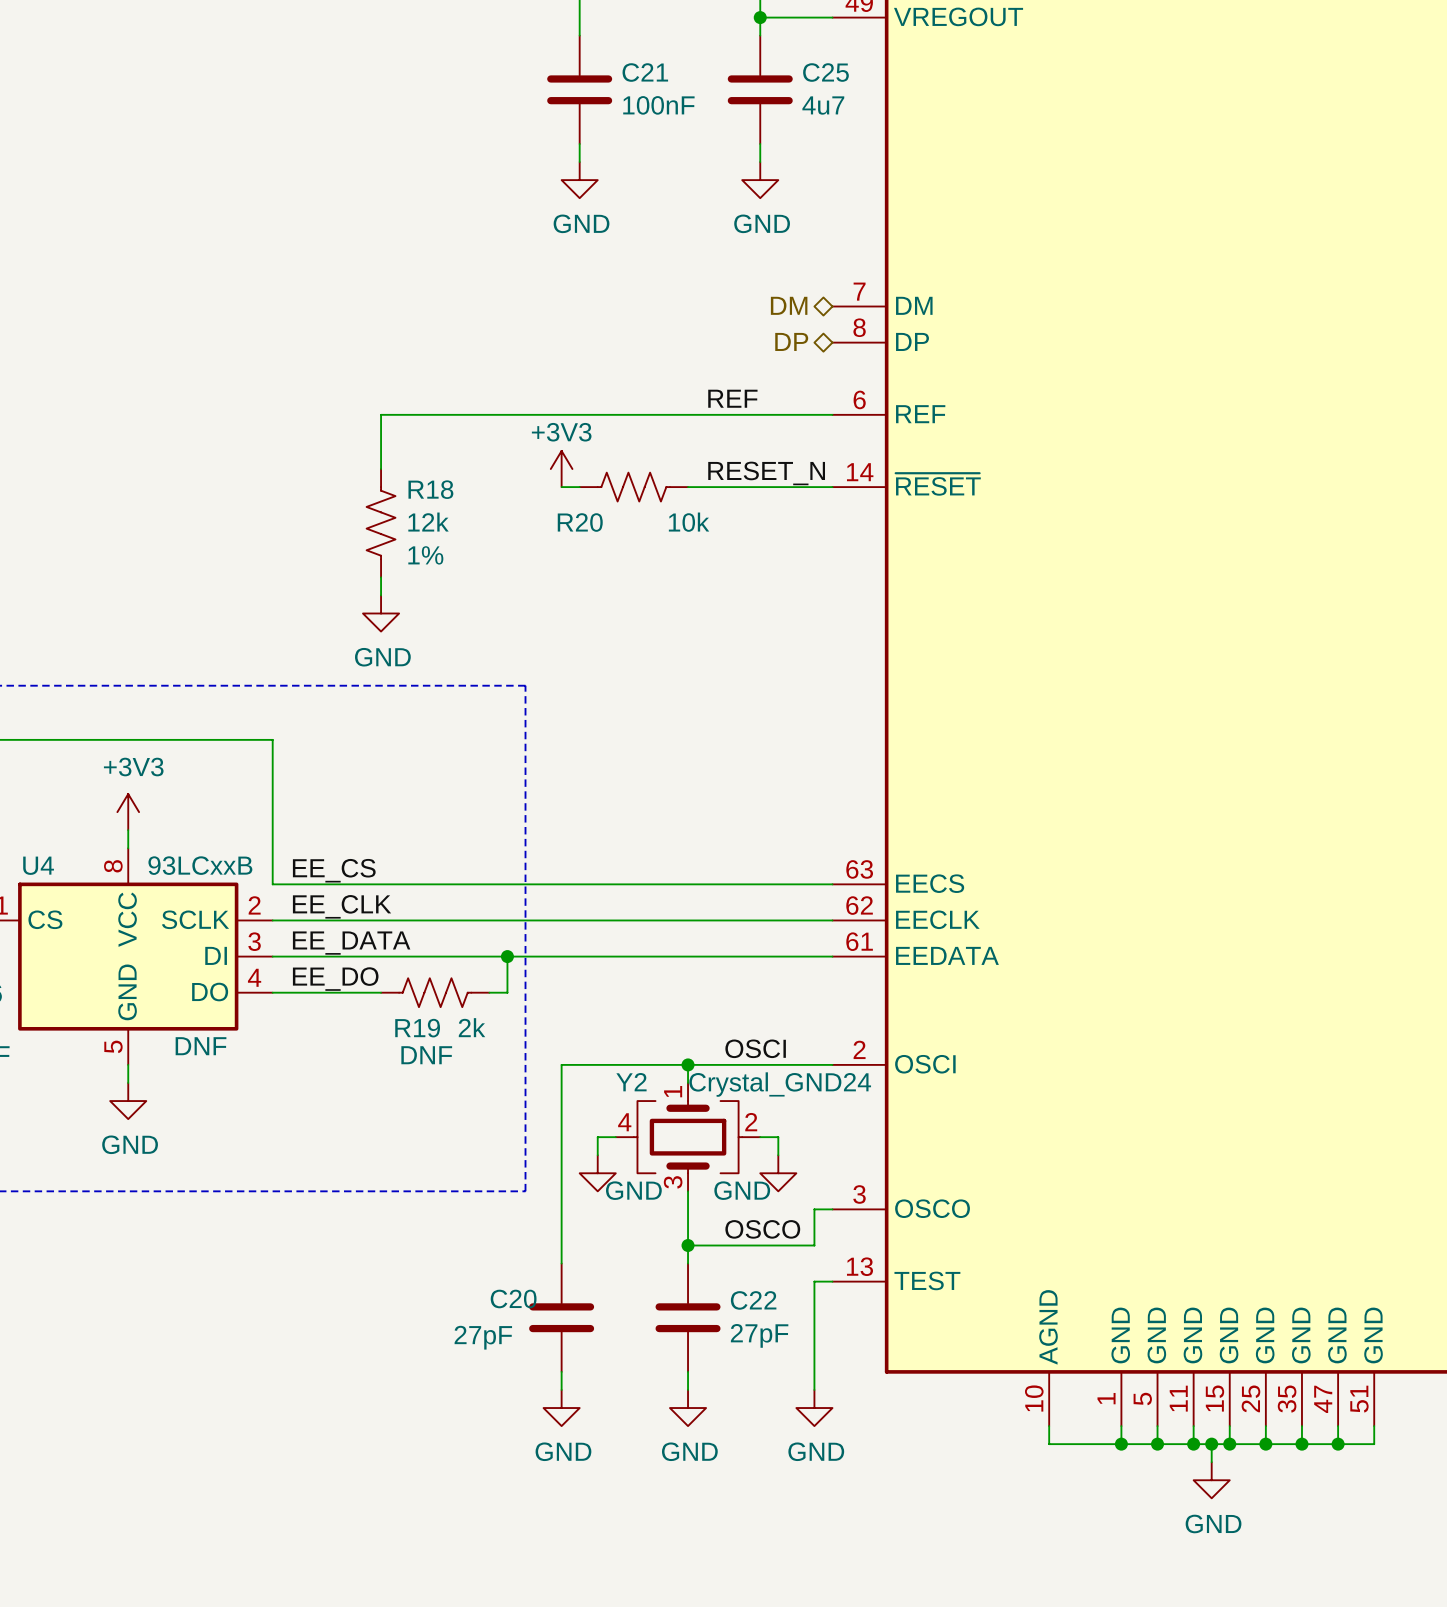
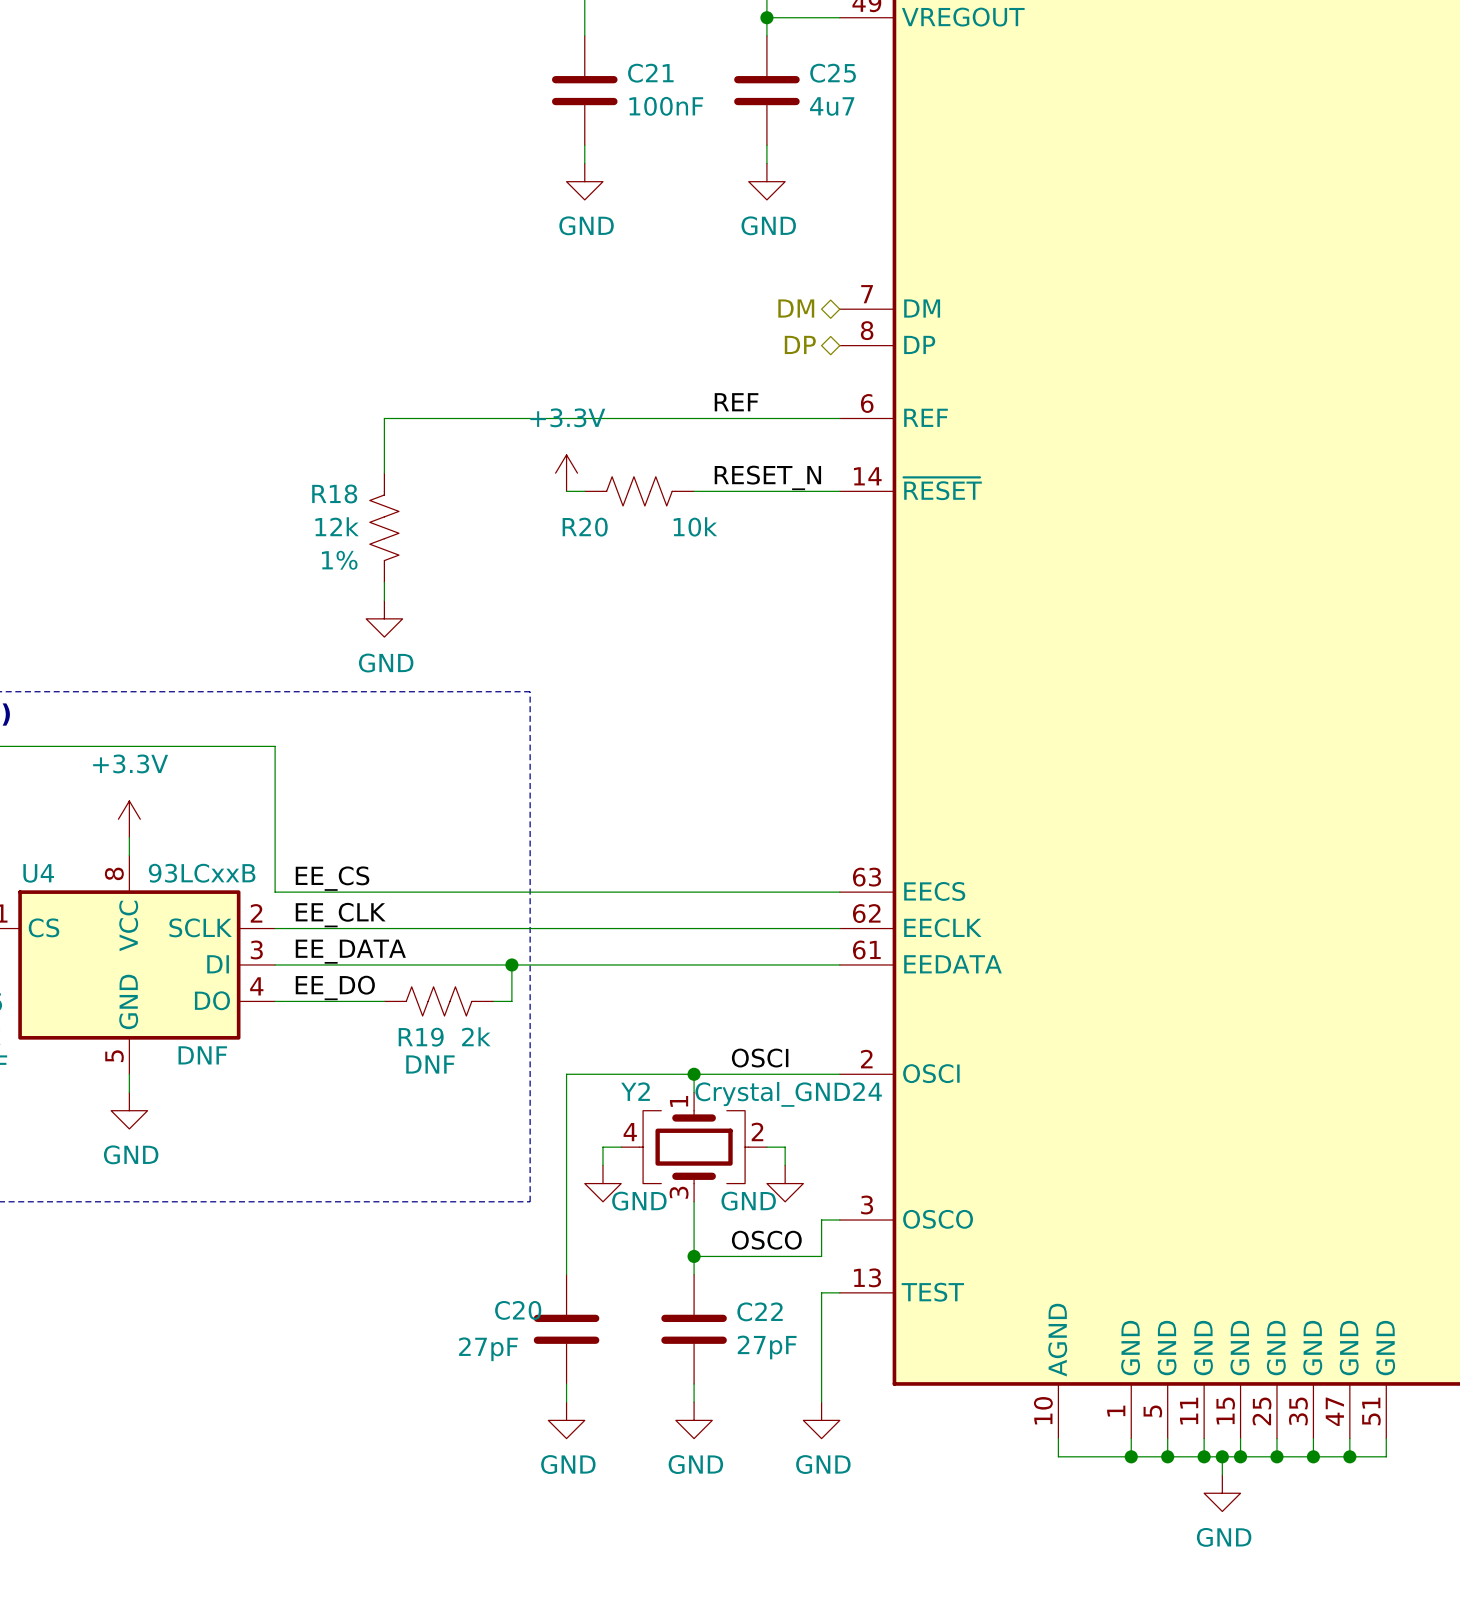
power symbol: +3V3 (561, 469) -> +3.3V (566, 473)
R18 flip: as is (381, 523) -> left-right (384, 527)
power symbol: +3V3 (128, 812) -> +3.3V (129, 819)

